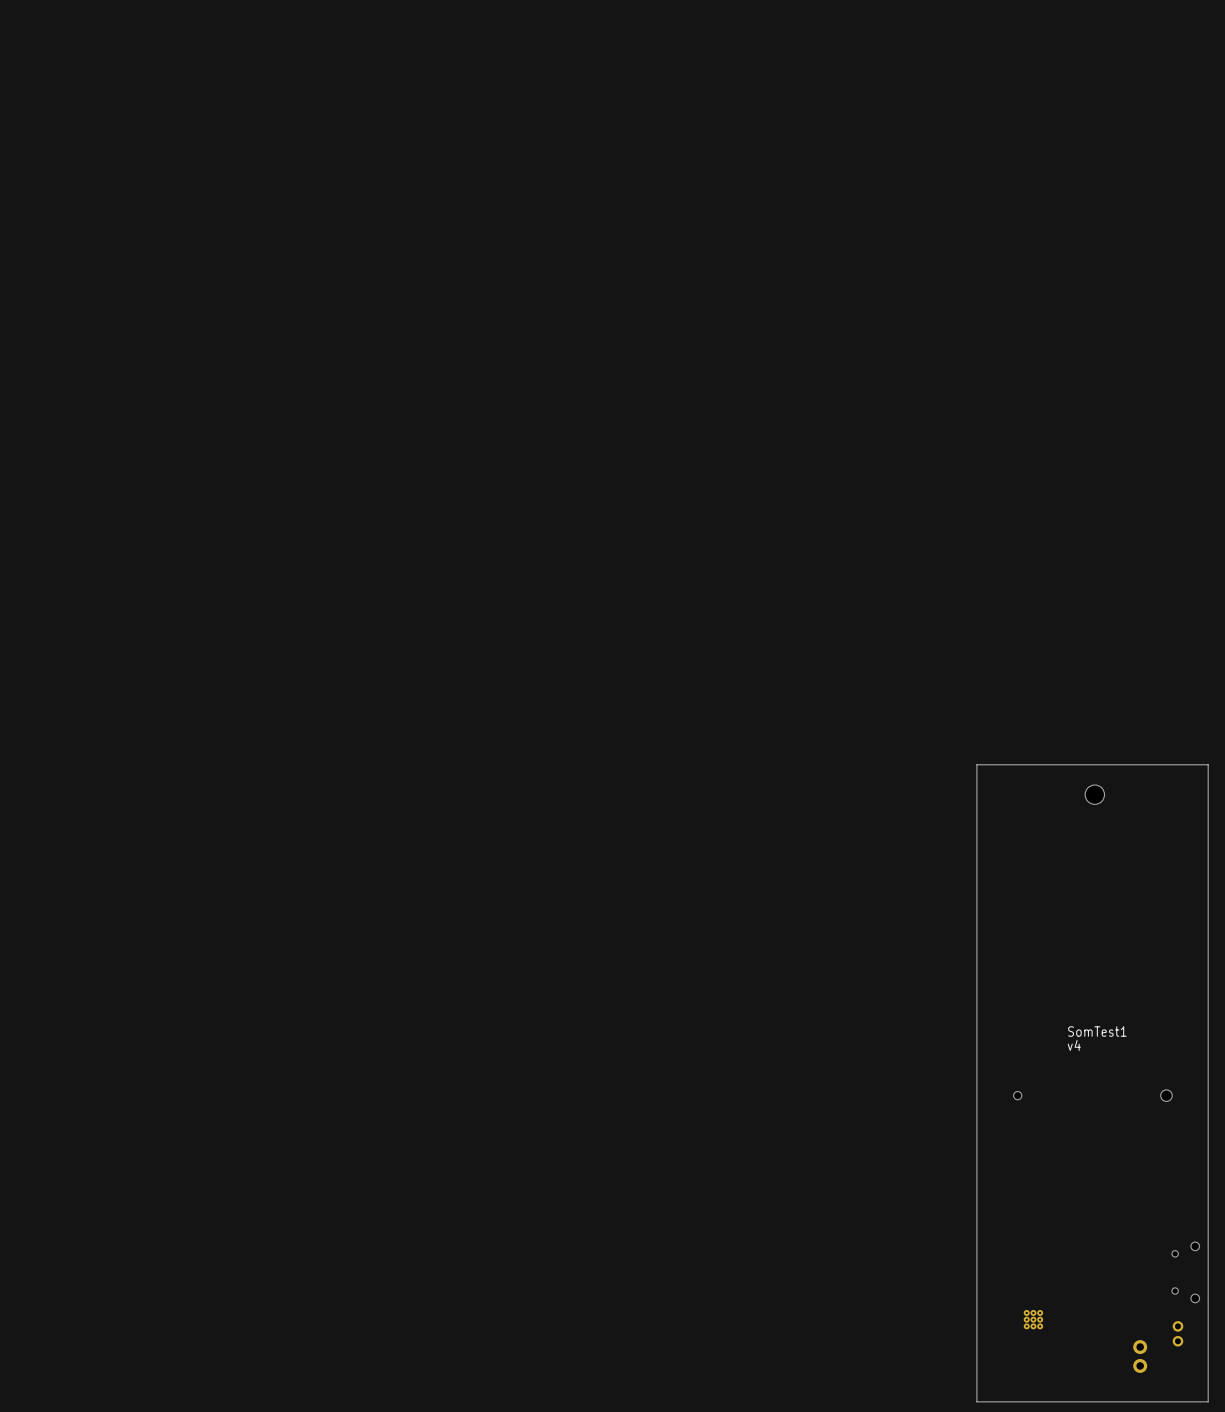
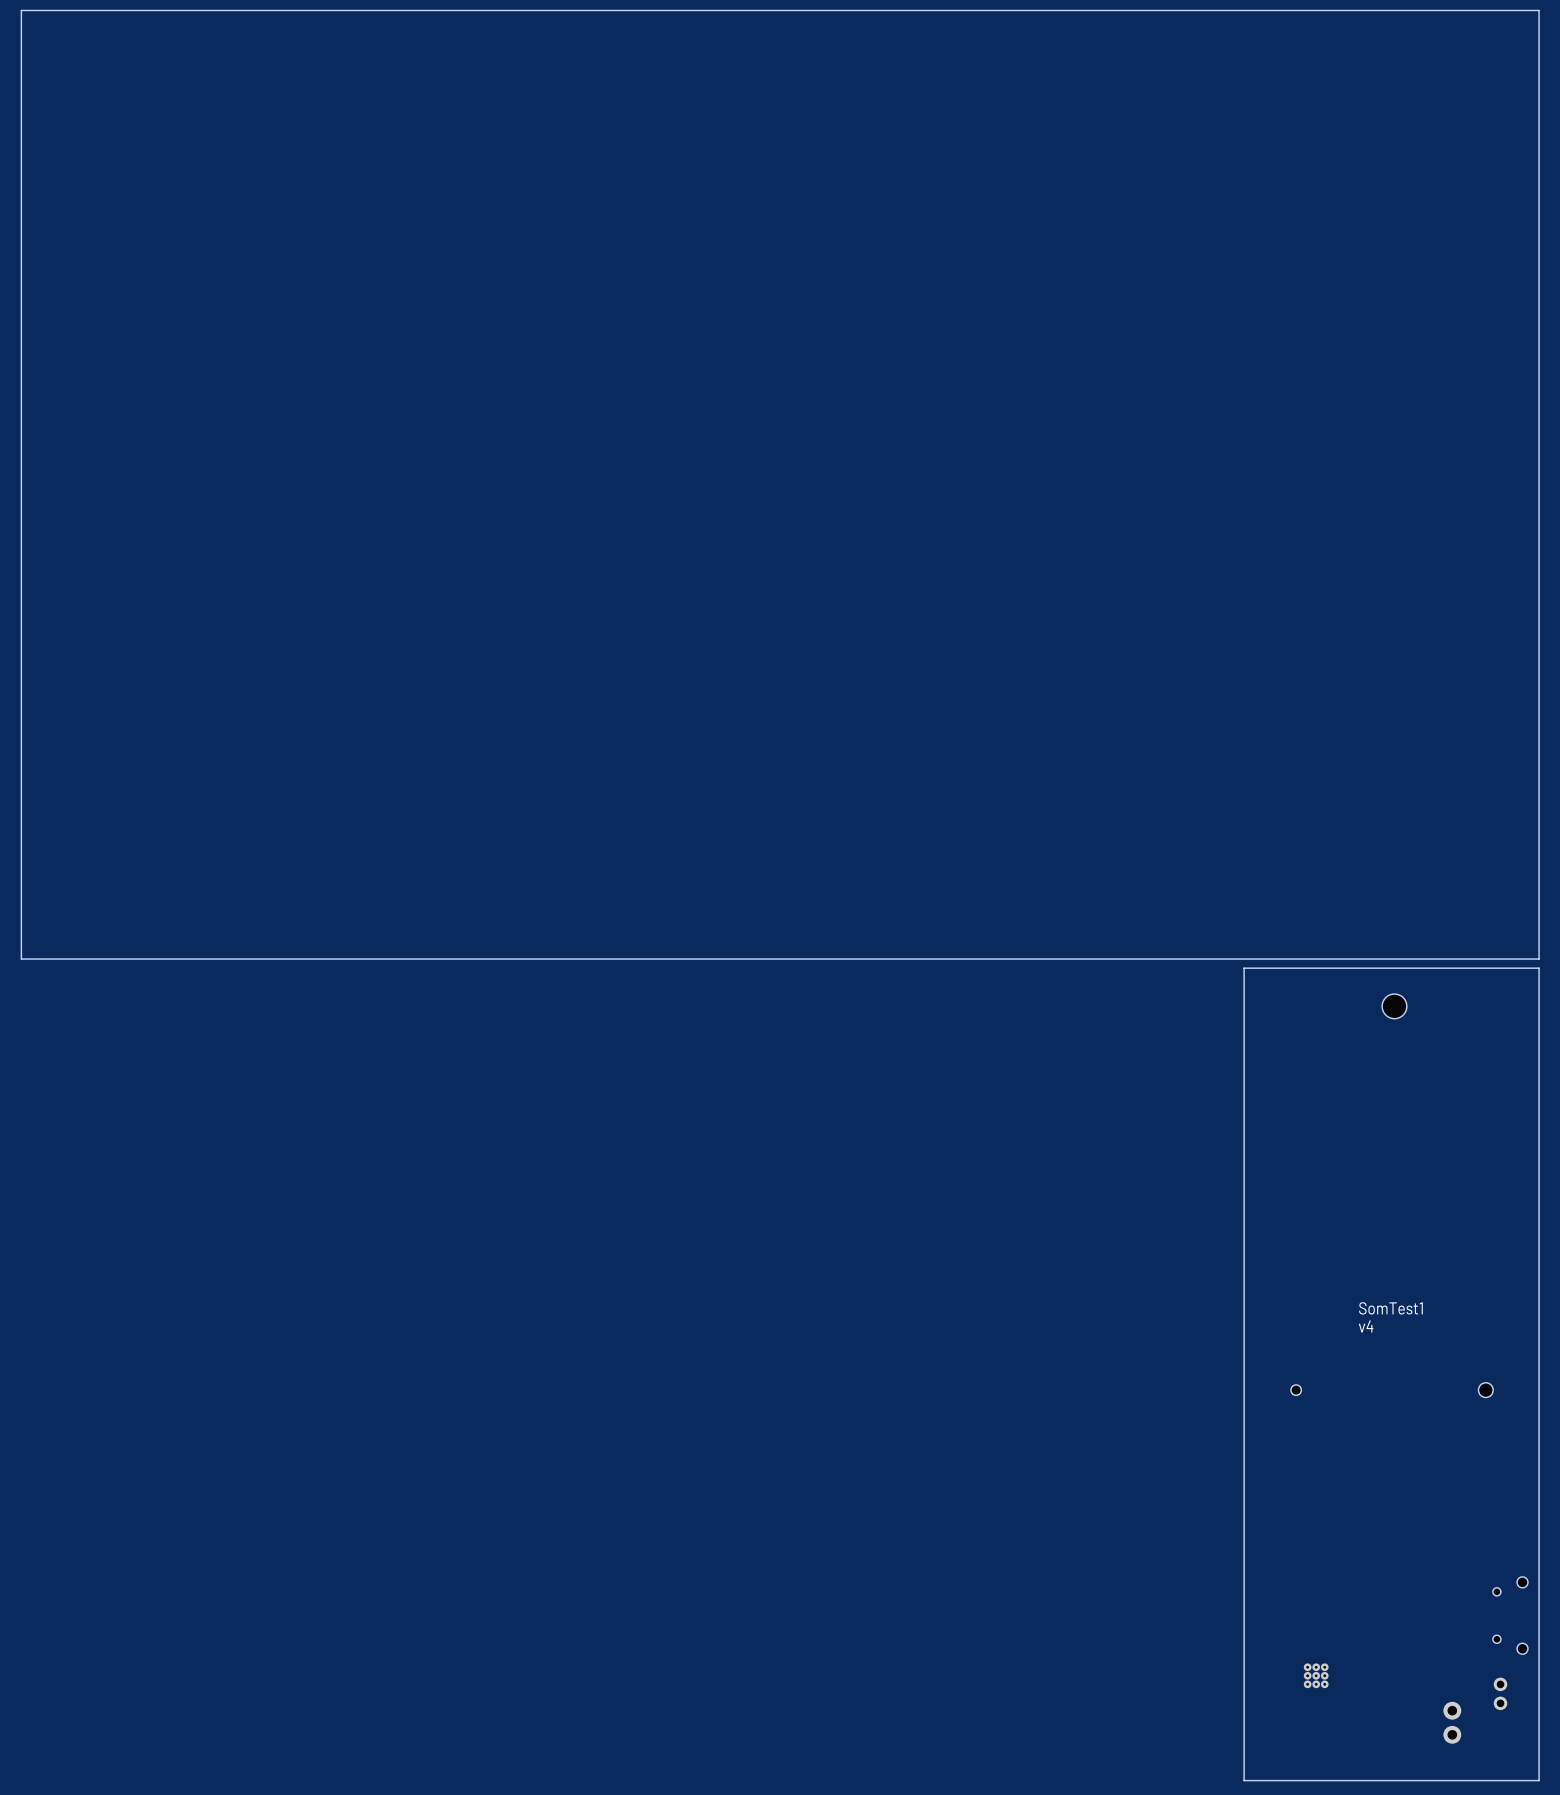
board edge: none -> (1539, 10) (21, 10) (21, 959) (1539, 959) (1539, 10)

